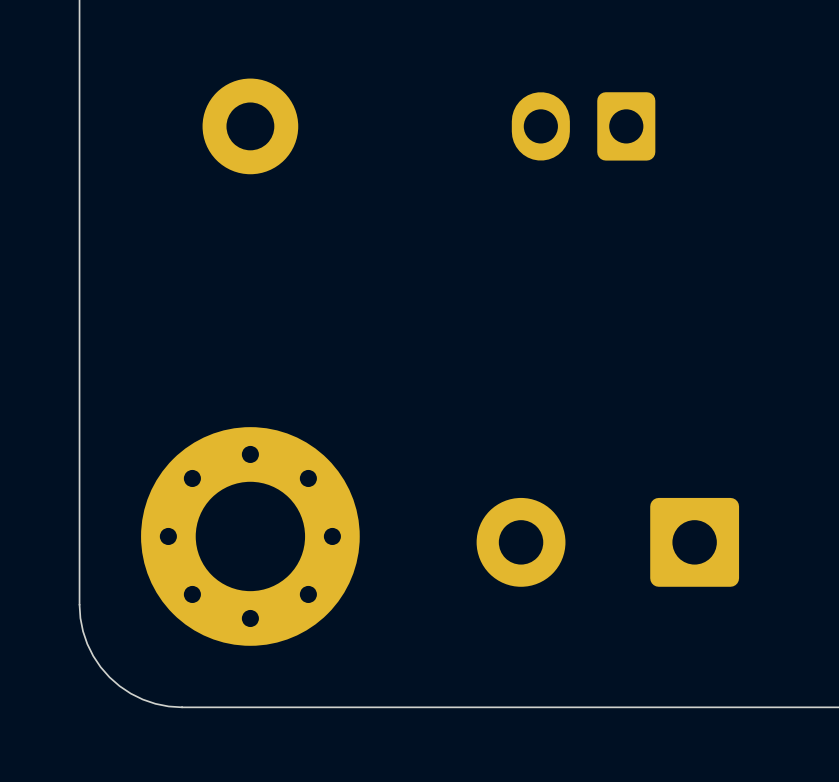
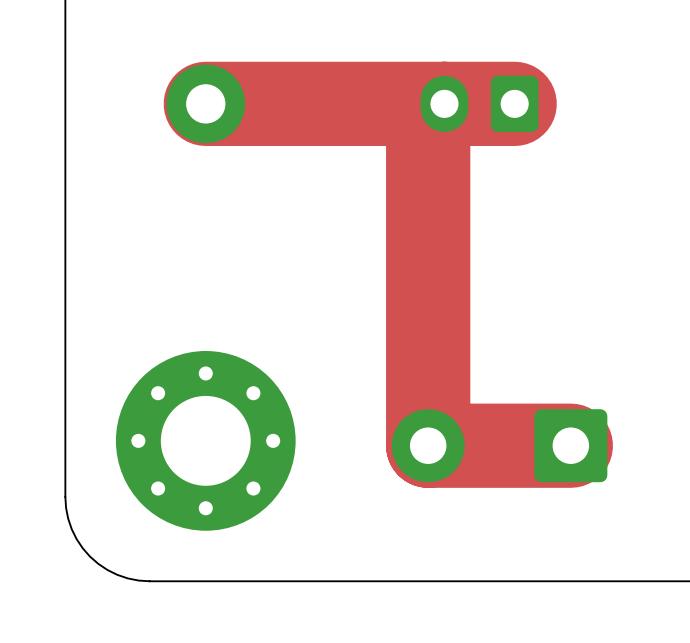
top track: none -> (444, 103) (428, 120) (428, 445) (570, 445)
top track: none -> (514, 103) (205, 103)

